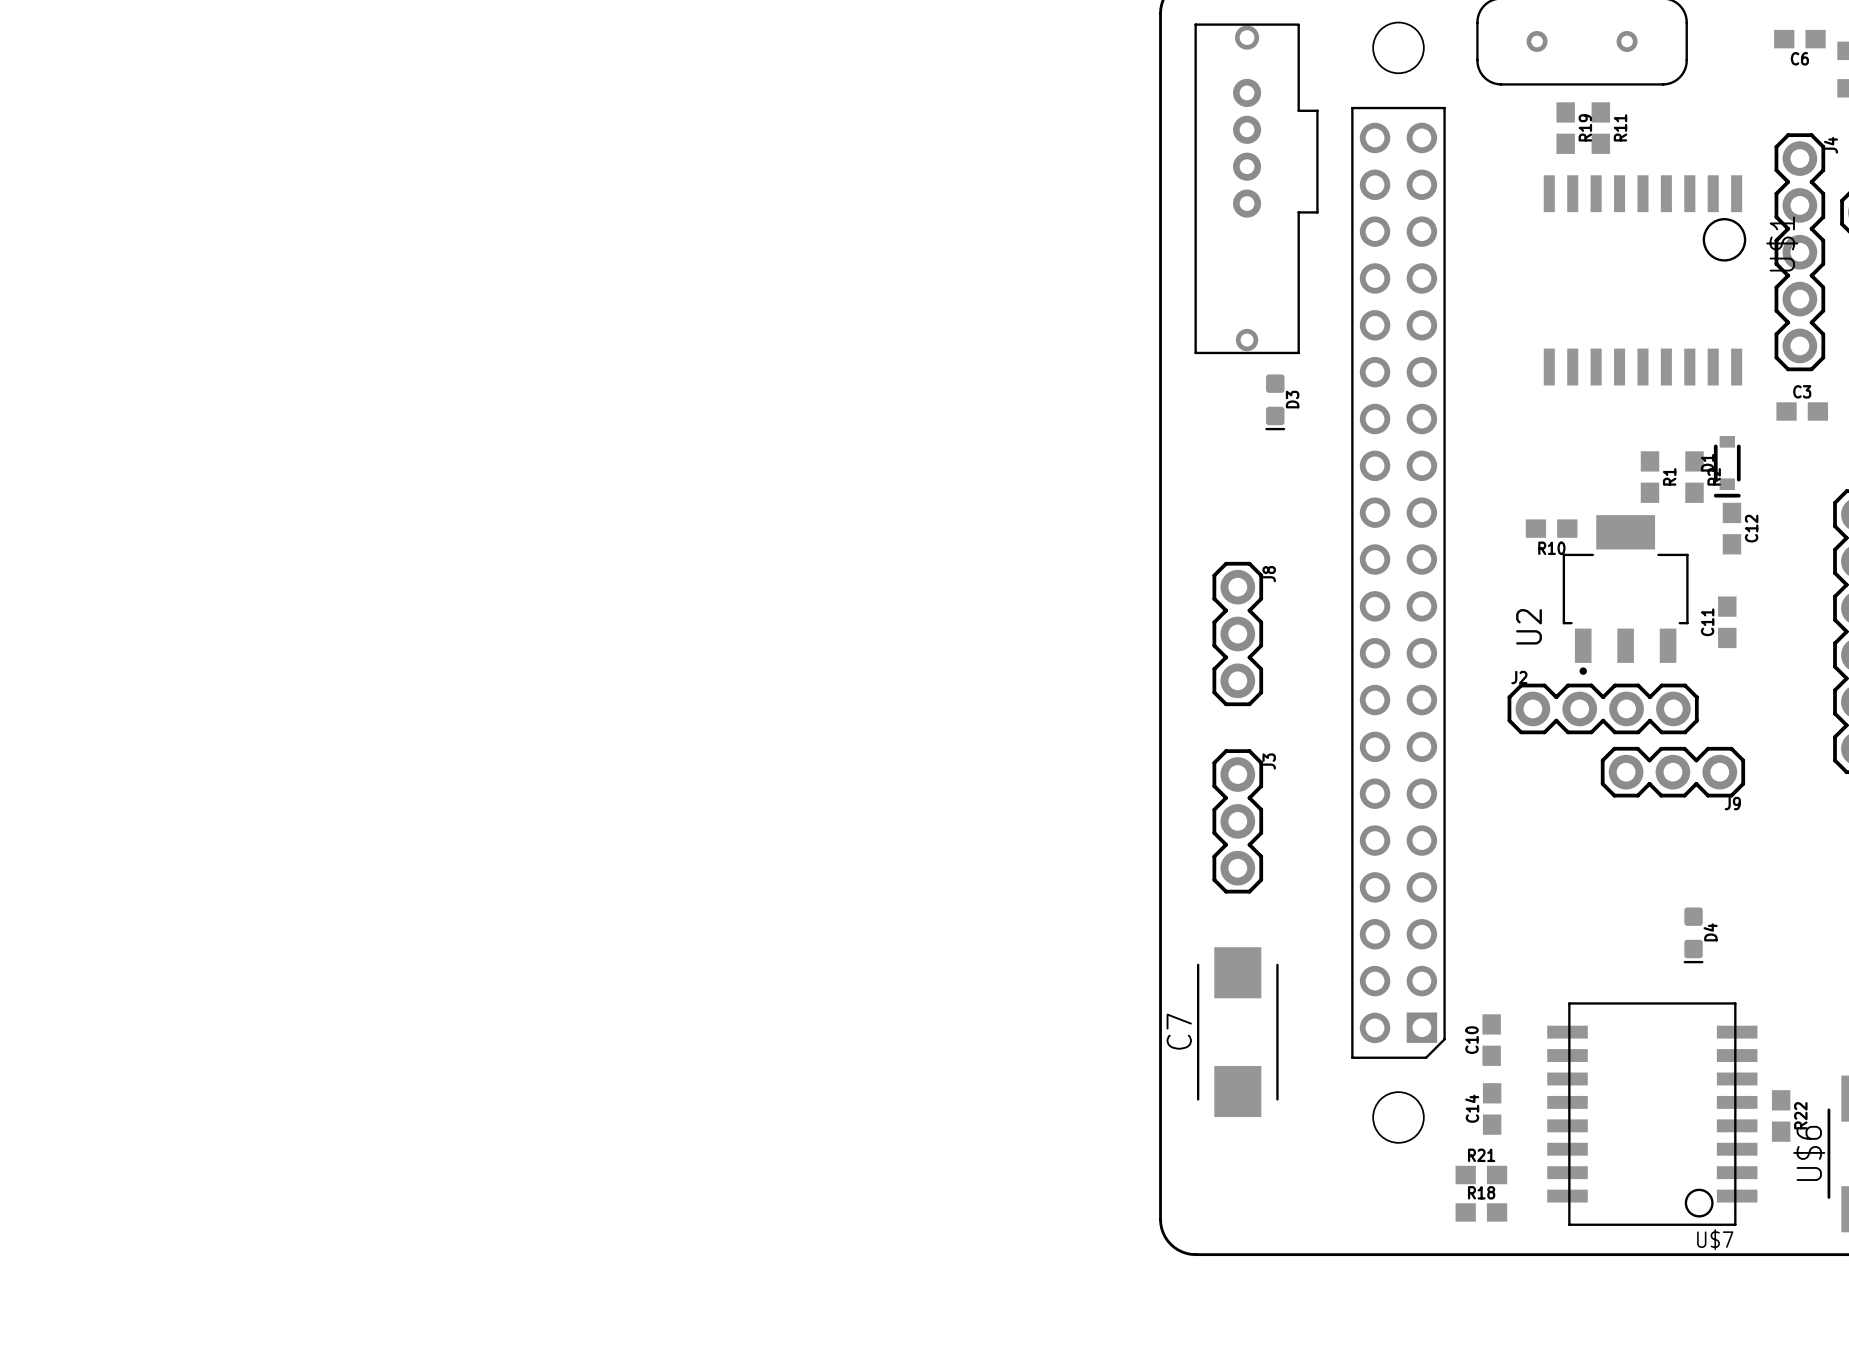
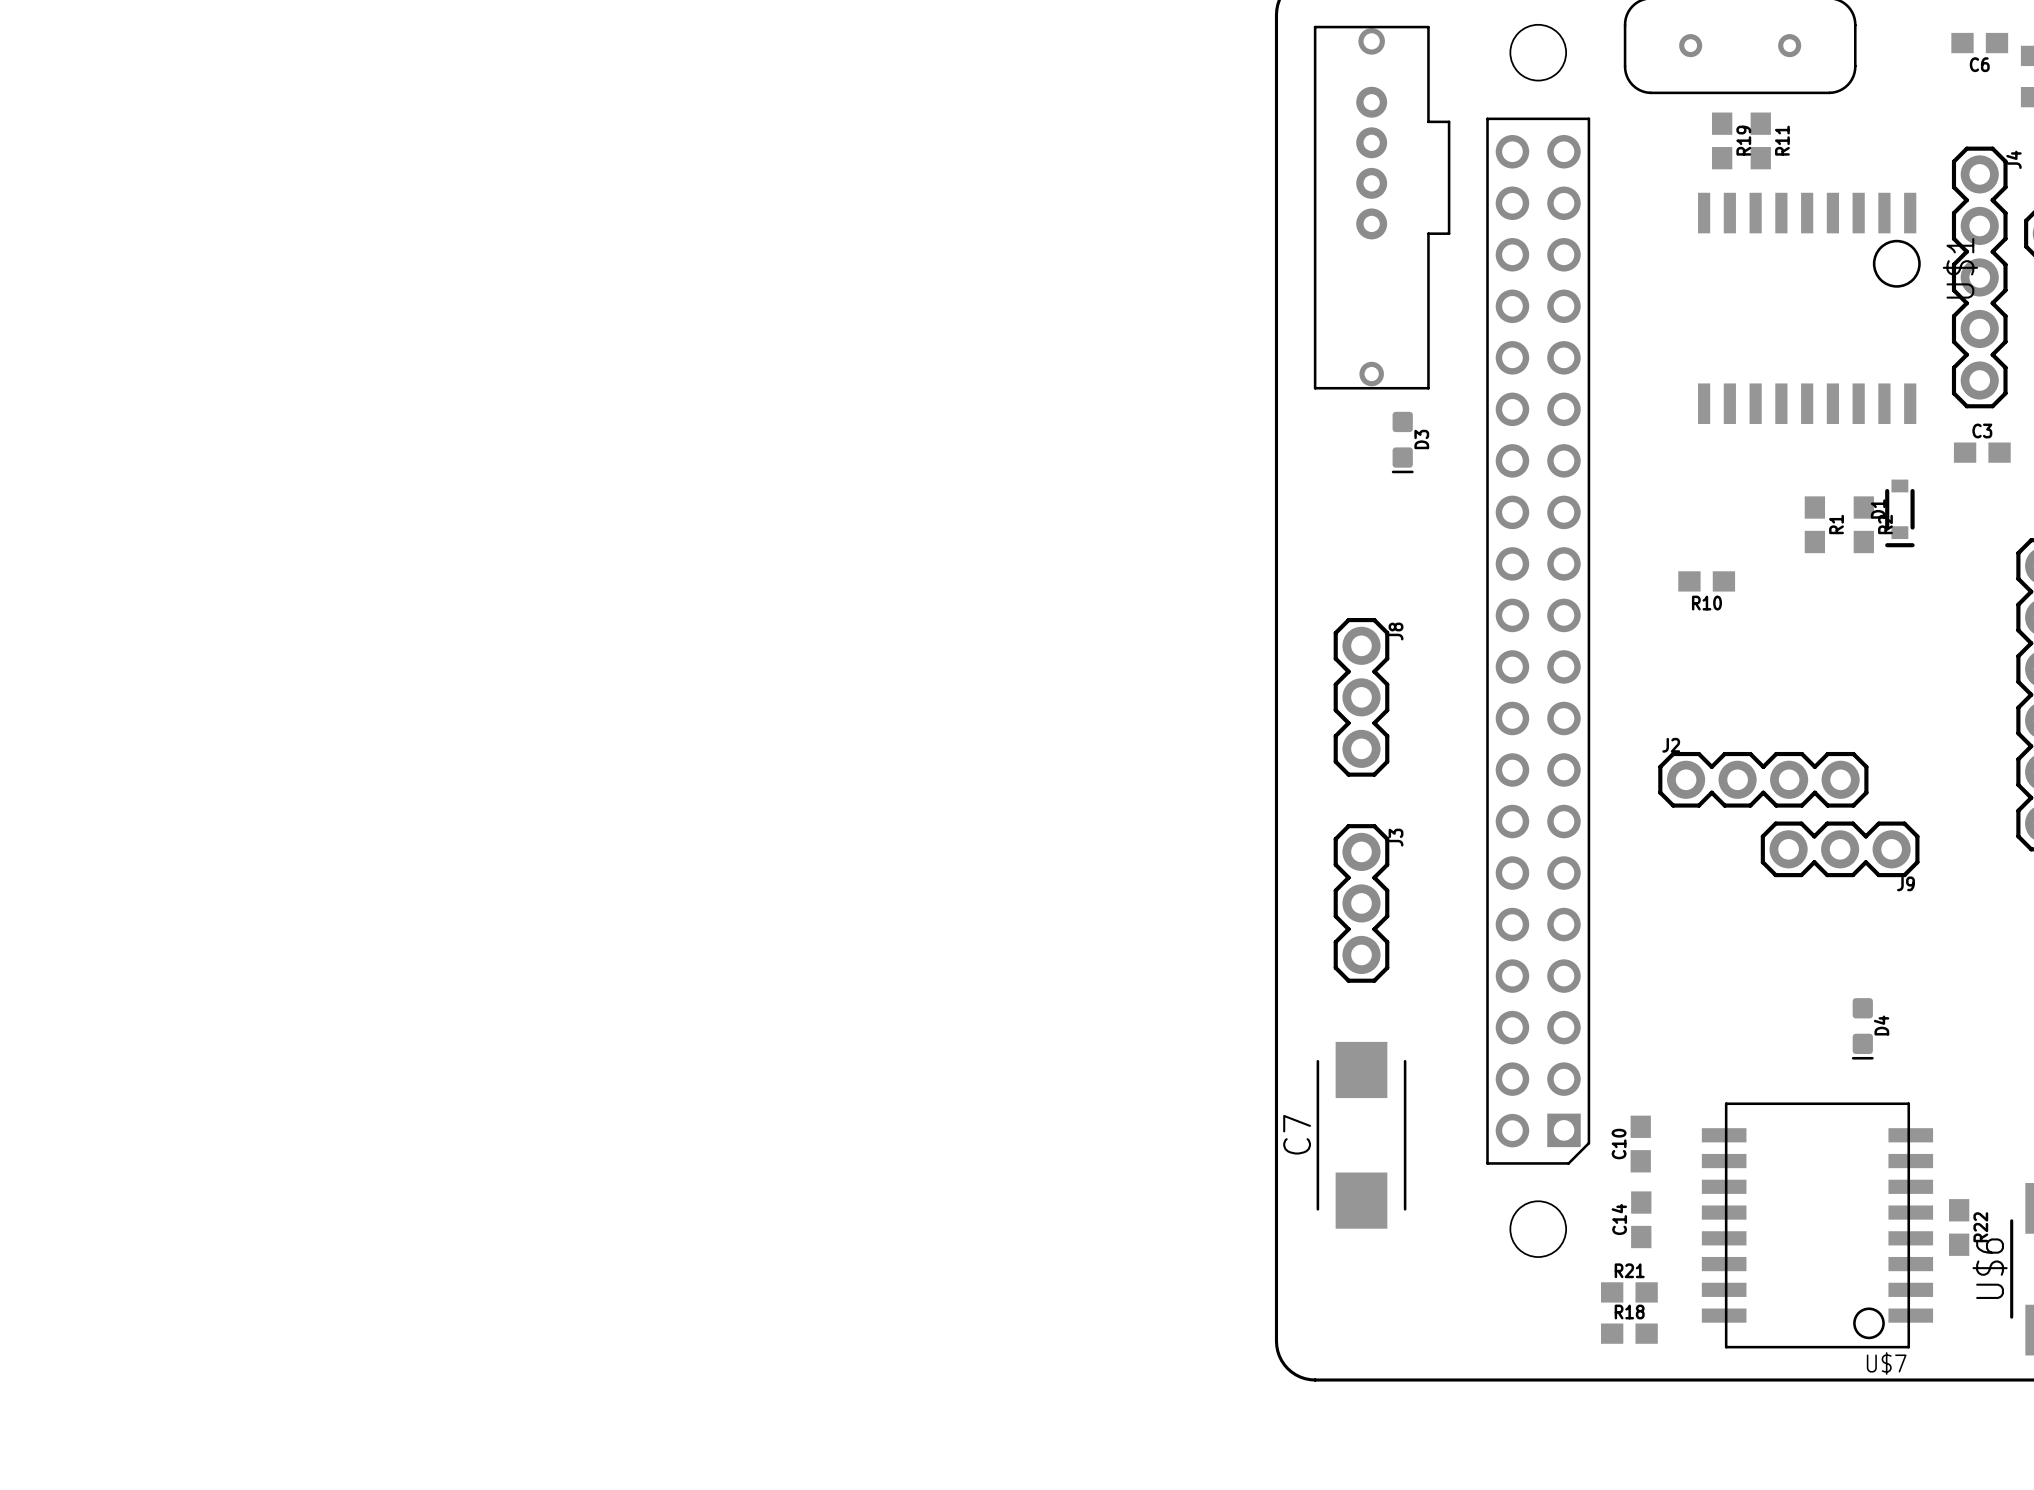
C12: (1731, 528) -> none
U2: (1625, 595) -> none
C11: (1727, 622) -> none

